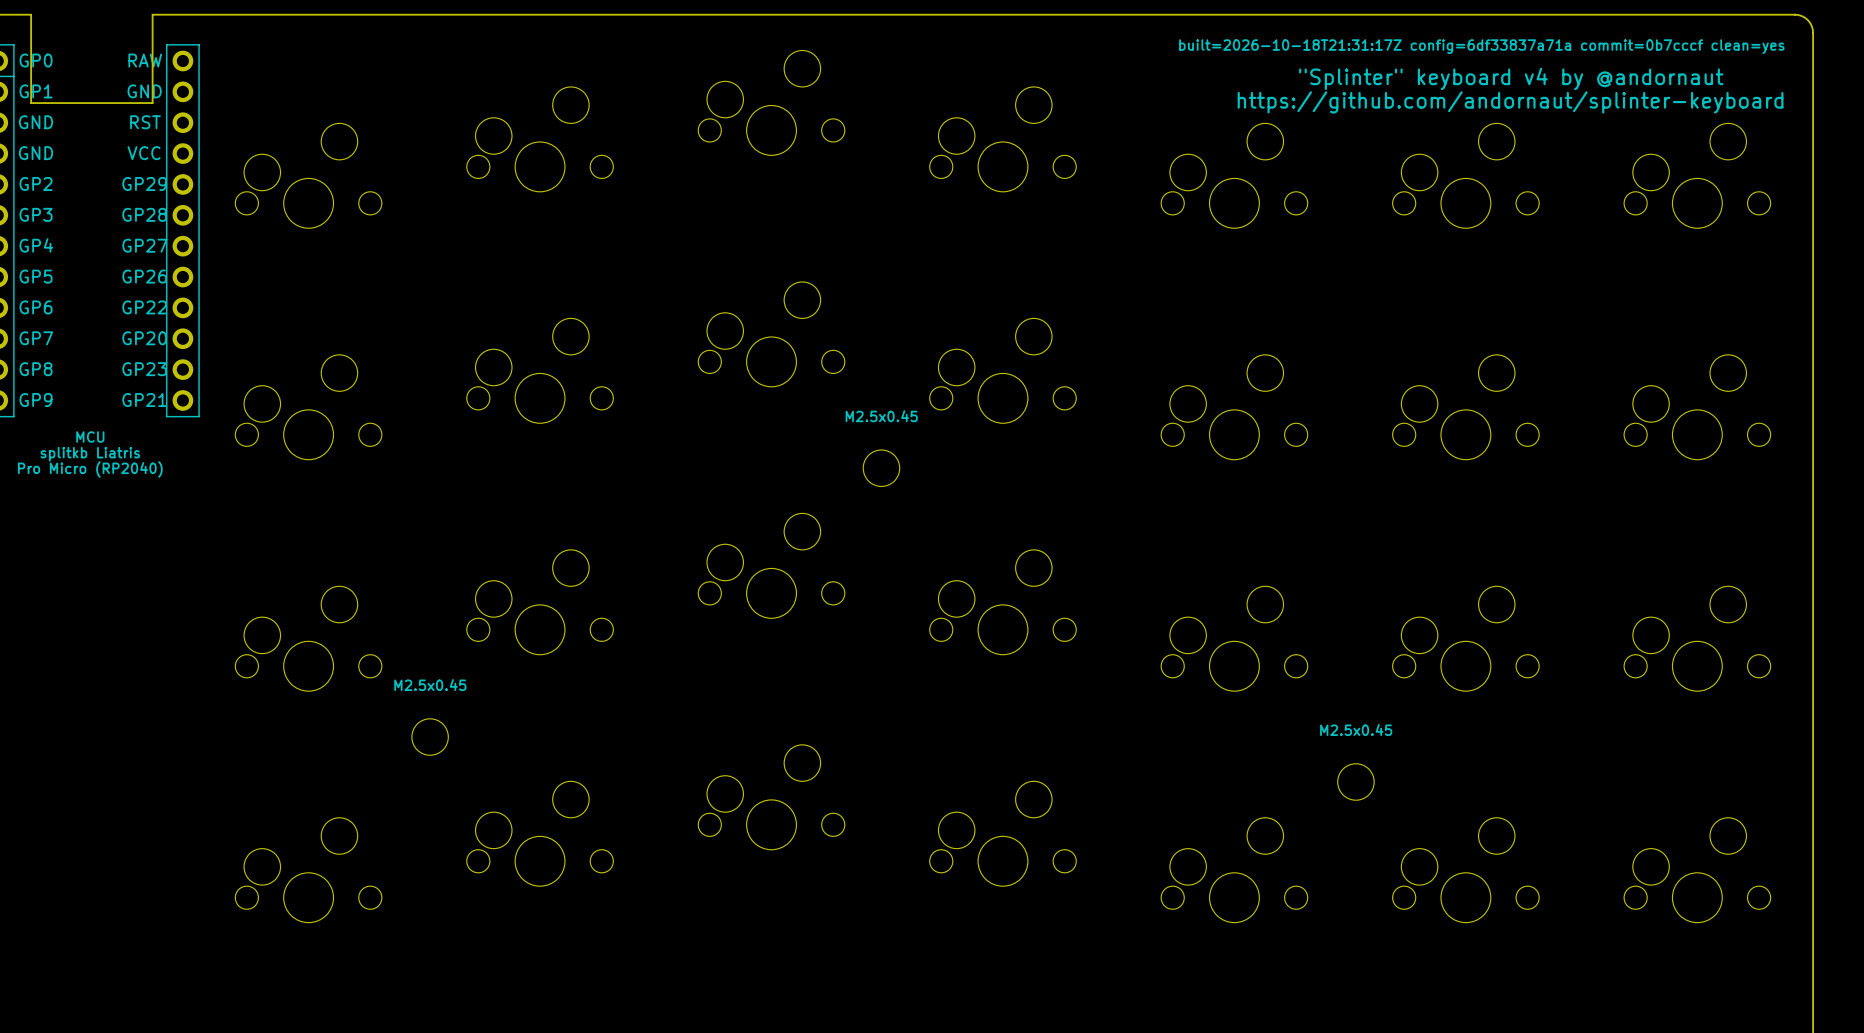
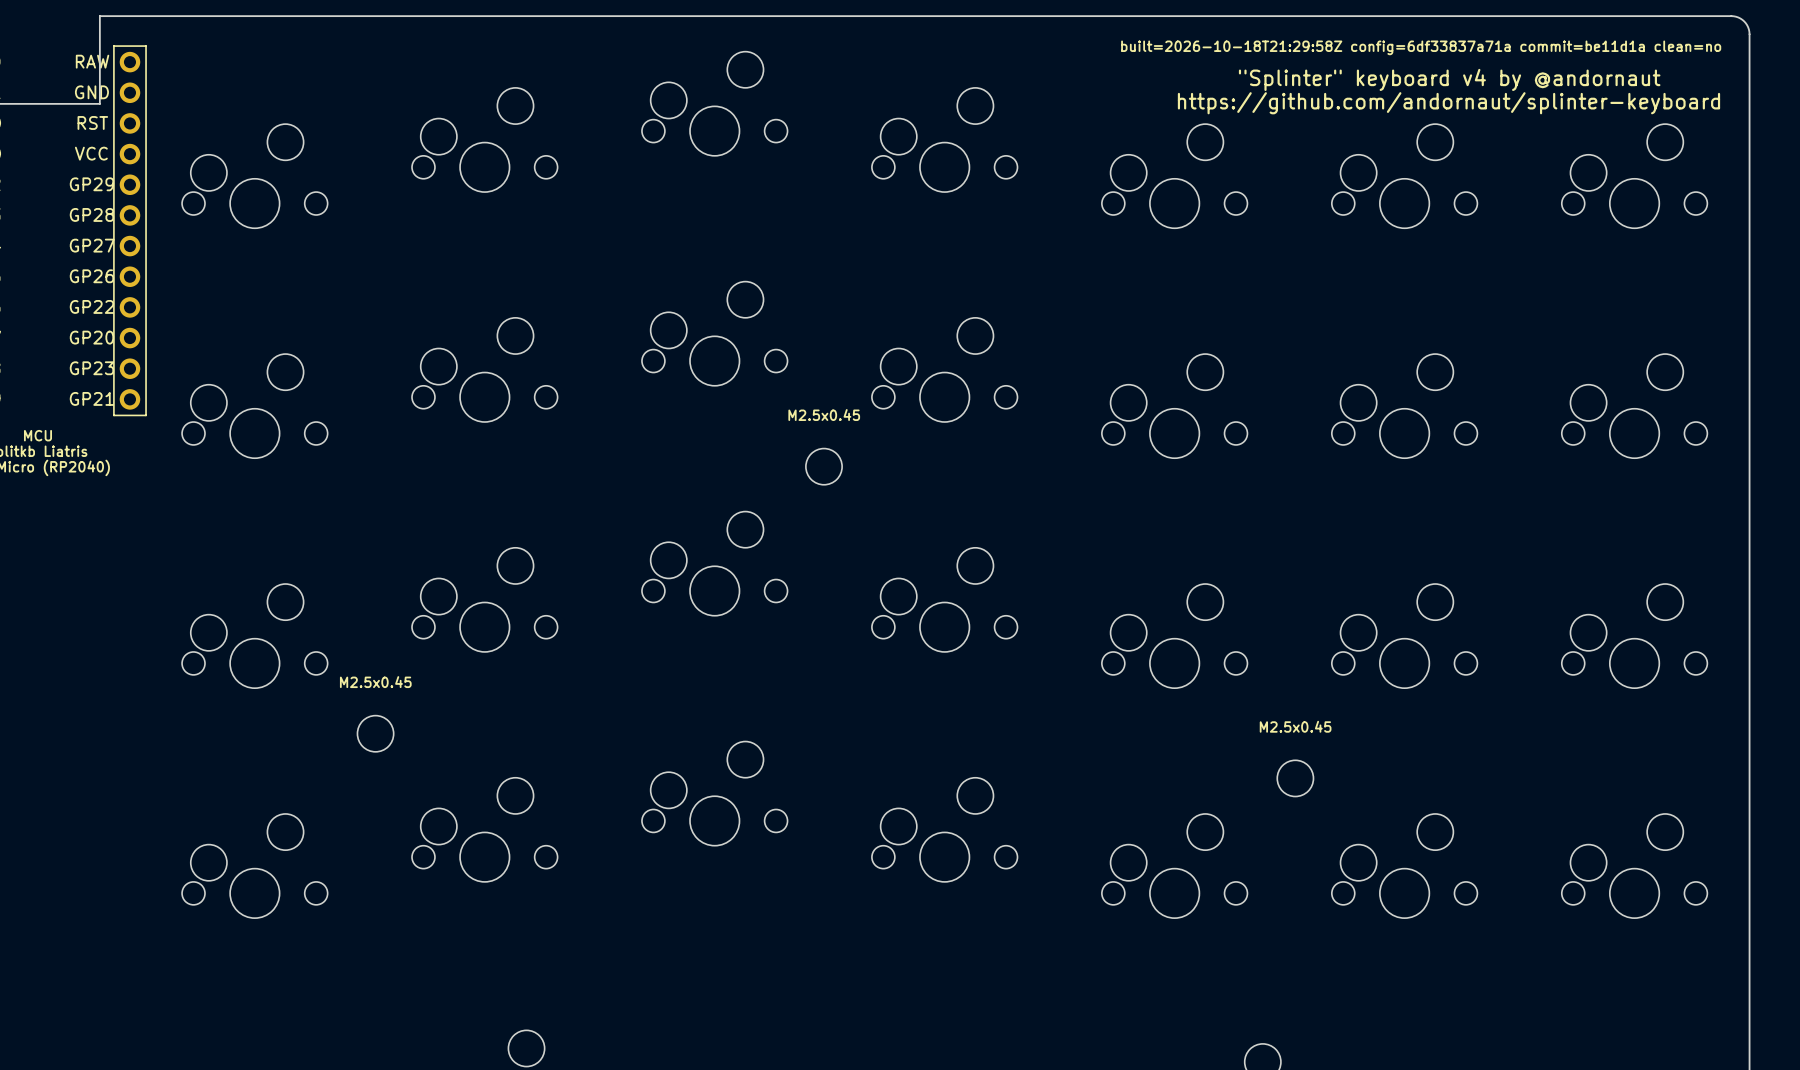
text: built=2026-10-18T21:31:17Z config=6df33837a71a commit=0b7cccf clean=yes (1481, 46) -> built=2026-10-18T21:29:58Z config=6df33837a71a commit=be11d1a clean=no (1421, 47)

